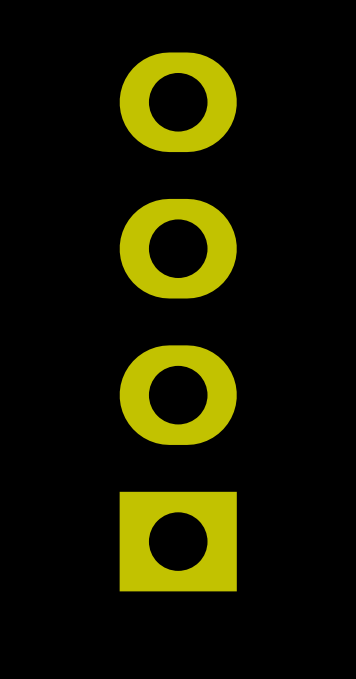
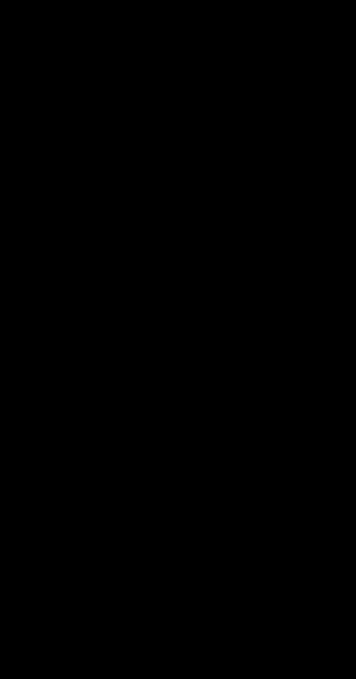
part: (178, 321) -> none

